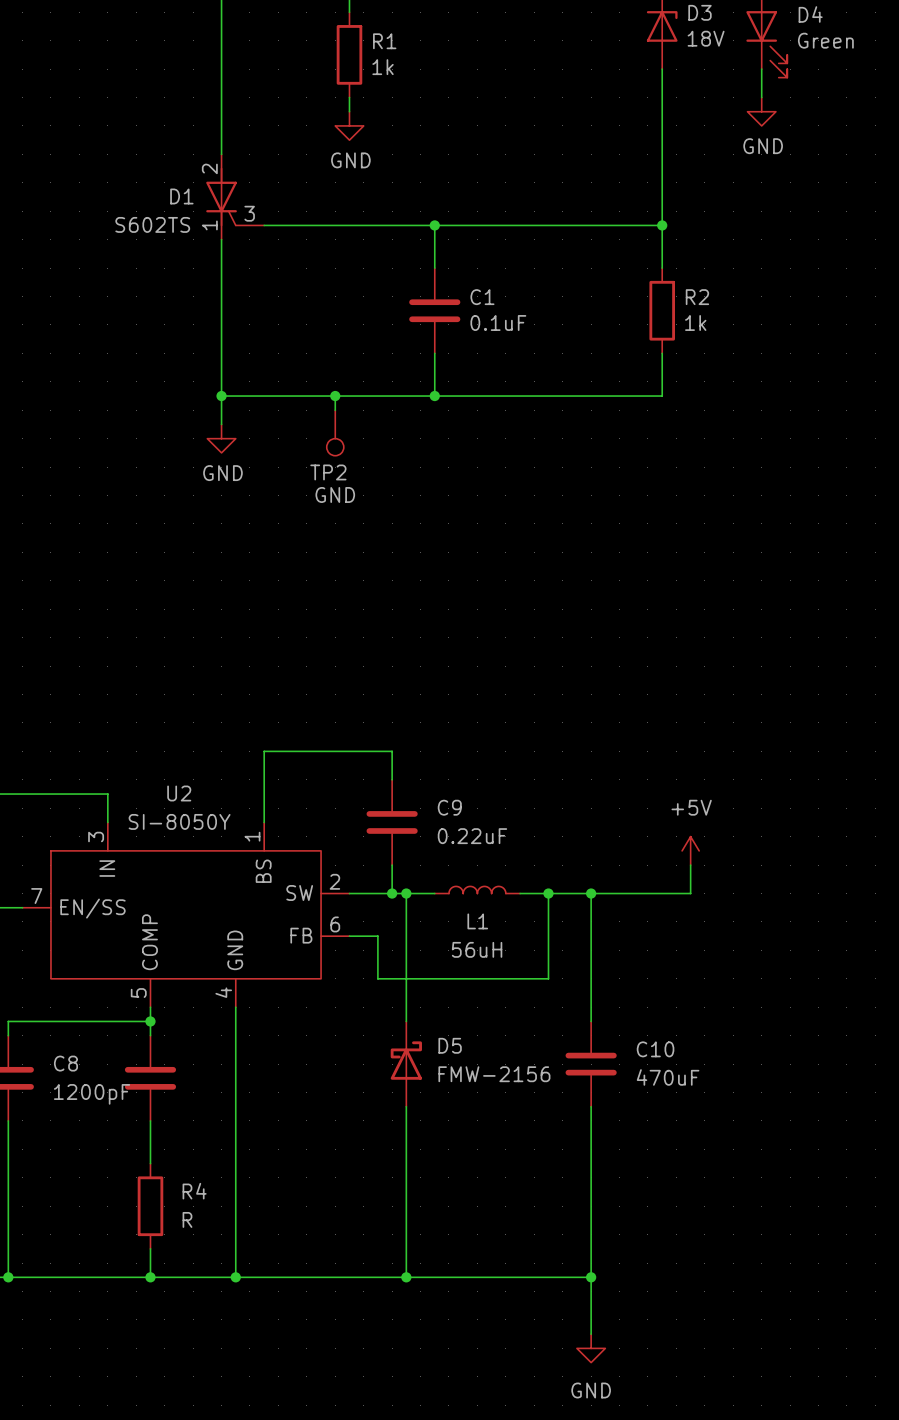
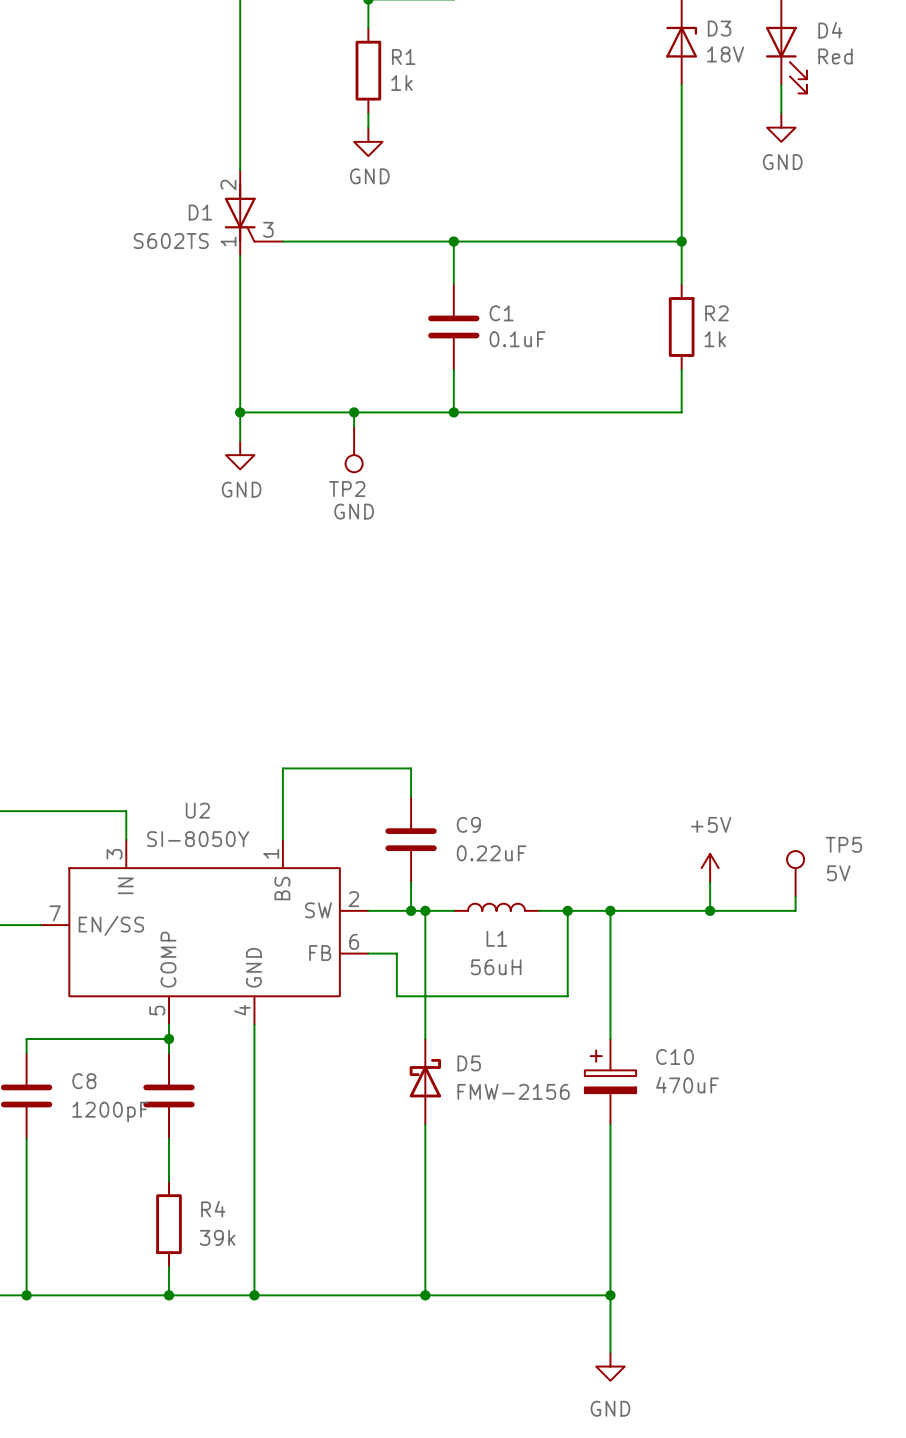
D4 value: Green (825, 40) -> Red (835, 56)
TP5: none -> 5V (795, 873)
wire: none -> (795, 896) (795, 910) (710, 910)
junction: none -> (710, 910)
C10 symbol: [565, 1021, 617, 1107] -> [584, 1039, 637, 1125]
R4 value: R (187, 1219) -> 39k (217, 1237)

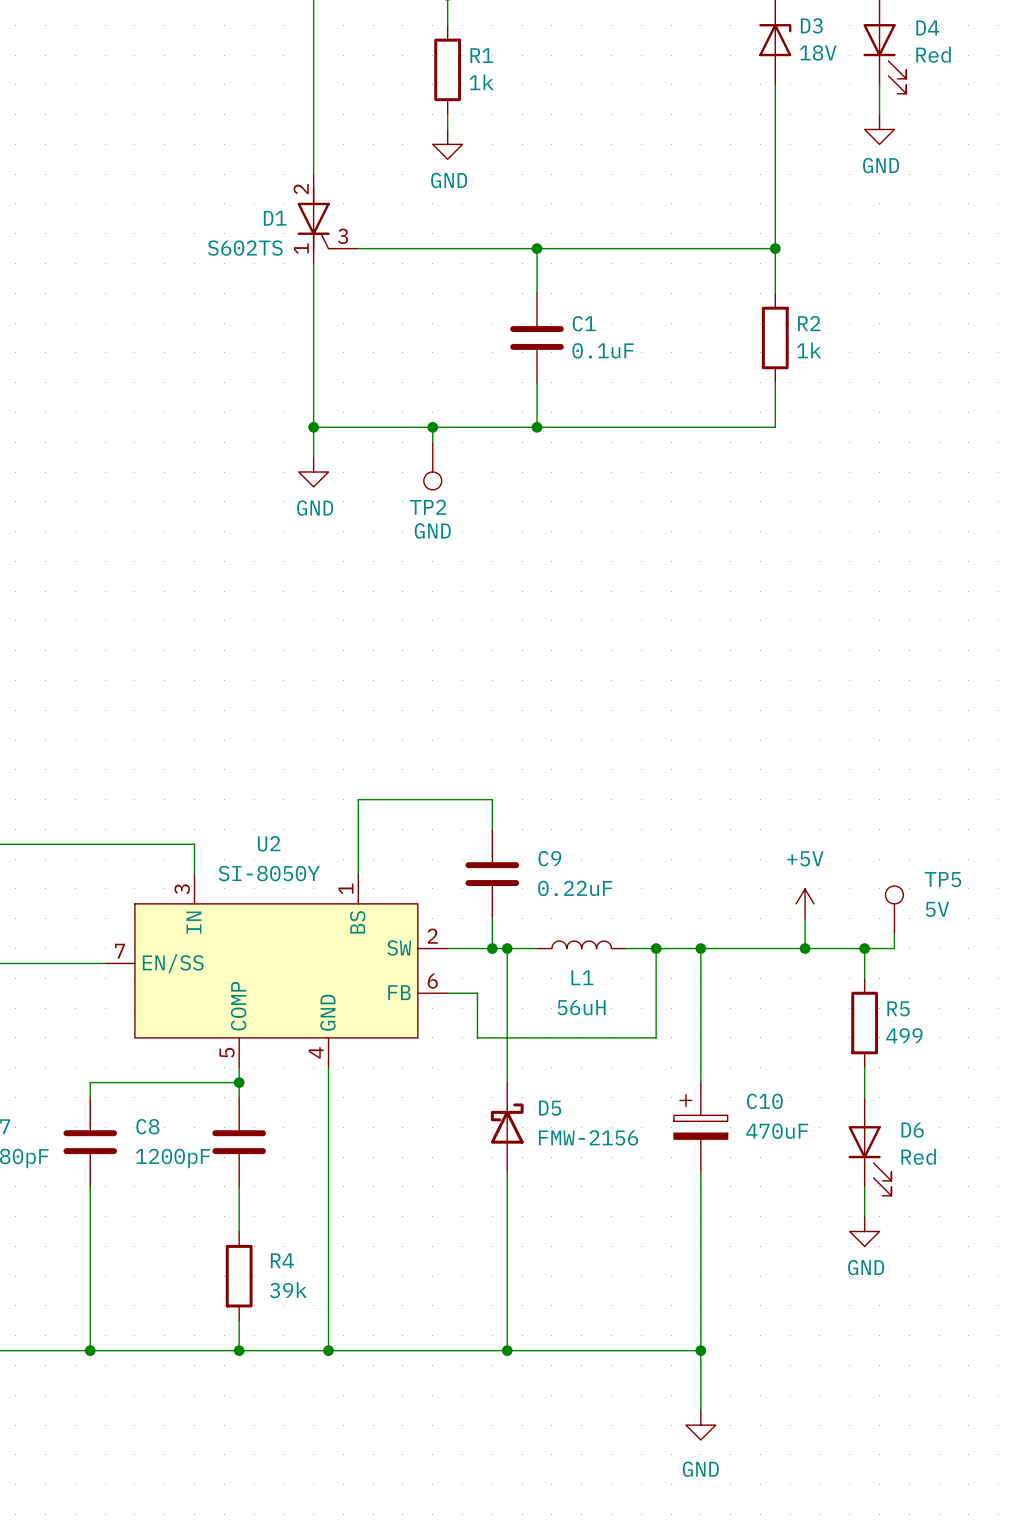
wire: none -> (864, 948) (864, 978)
junction: none -> (864, 948)
R5: none -> 499 (864, 1023)
wire: none -> (864, 1067) (864, 1097)
D6: none -> Red (870, 1146)
wire: none -> (864, 1186) (864, 1216)
power symbol: none -> GND (864, 1231)

